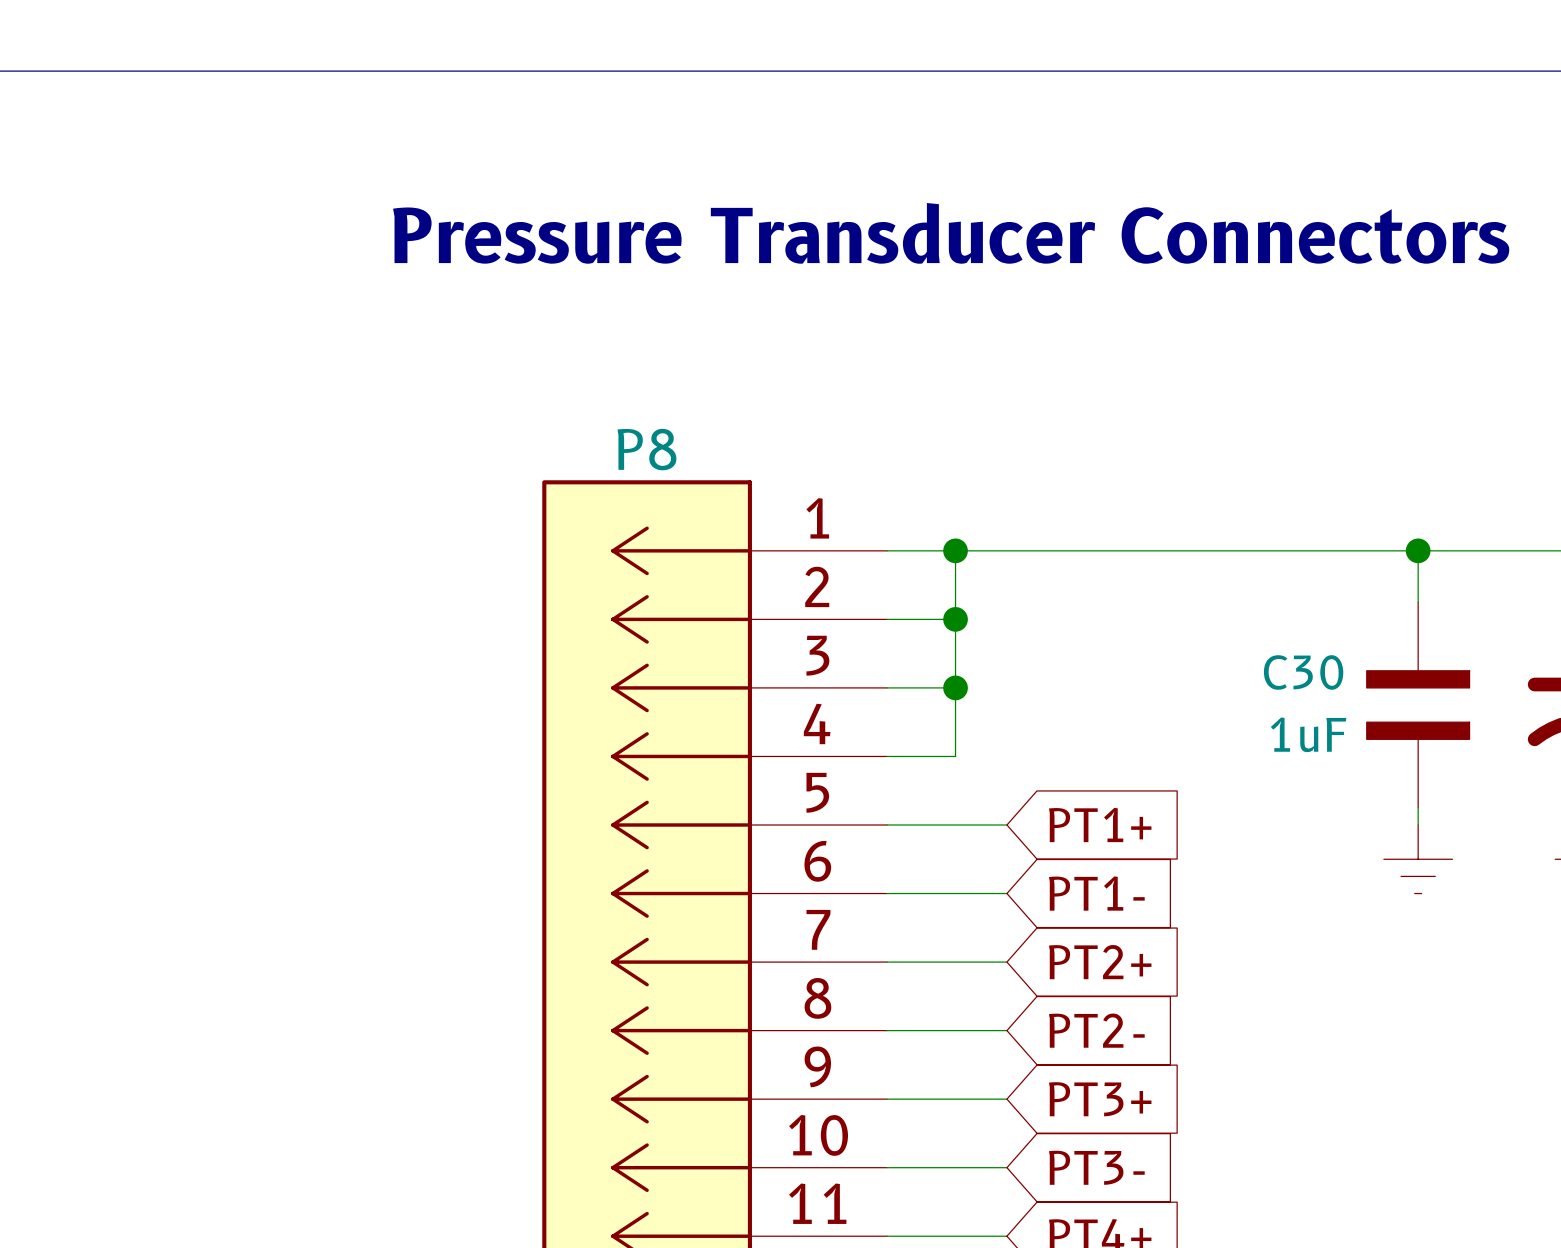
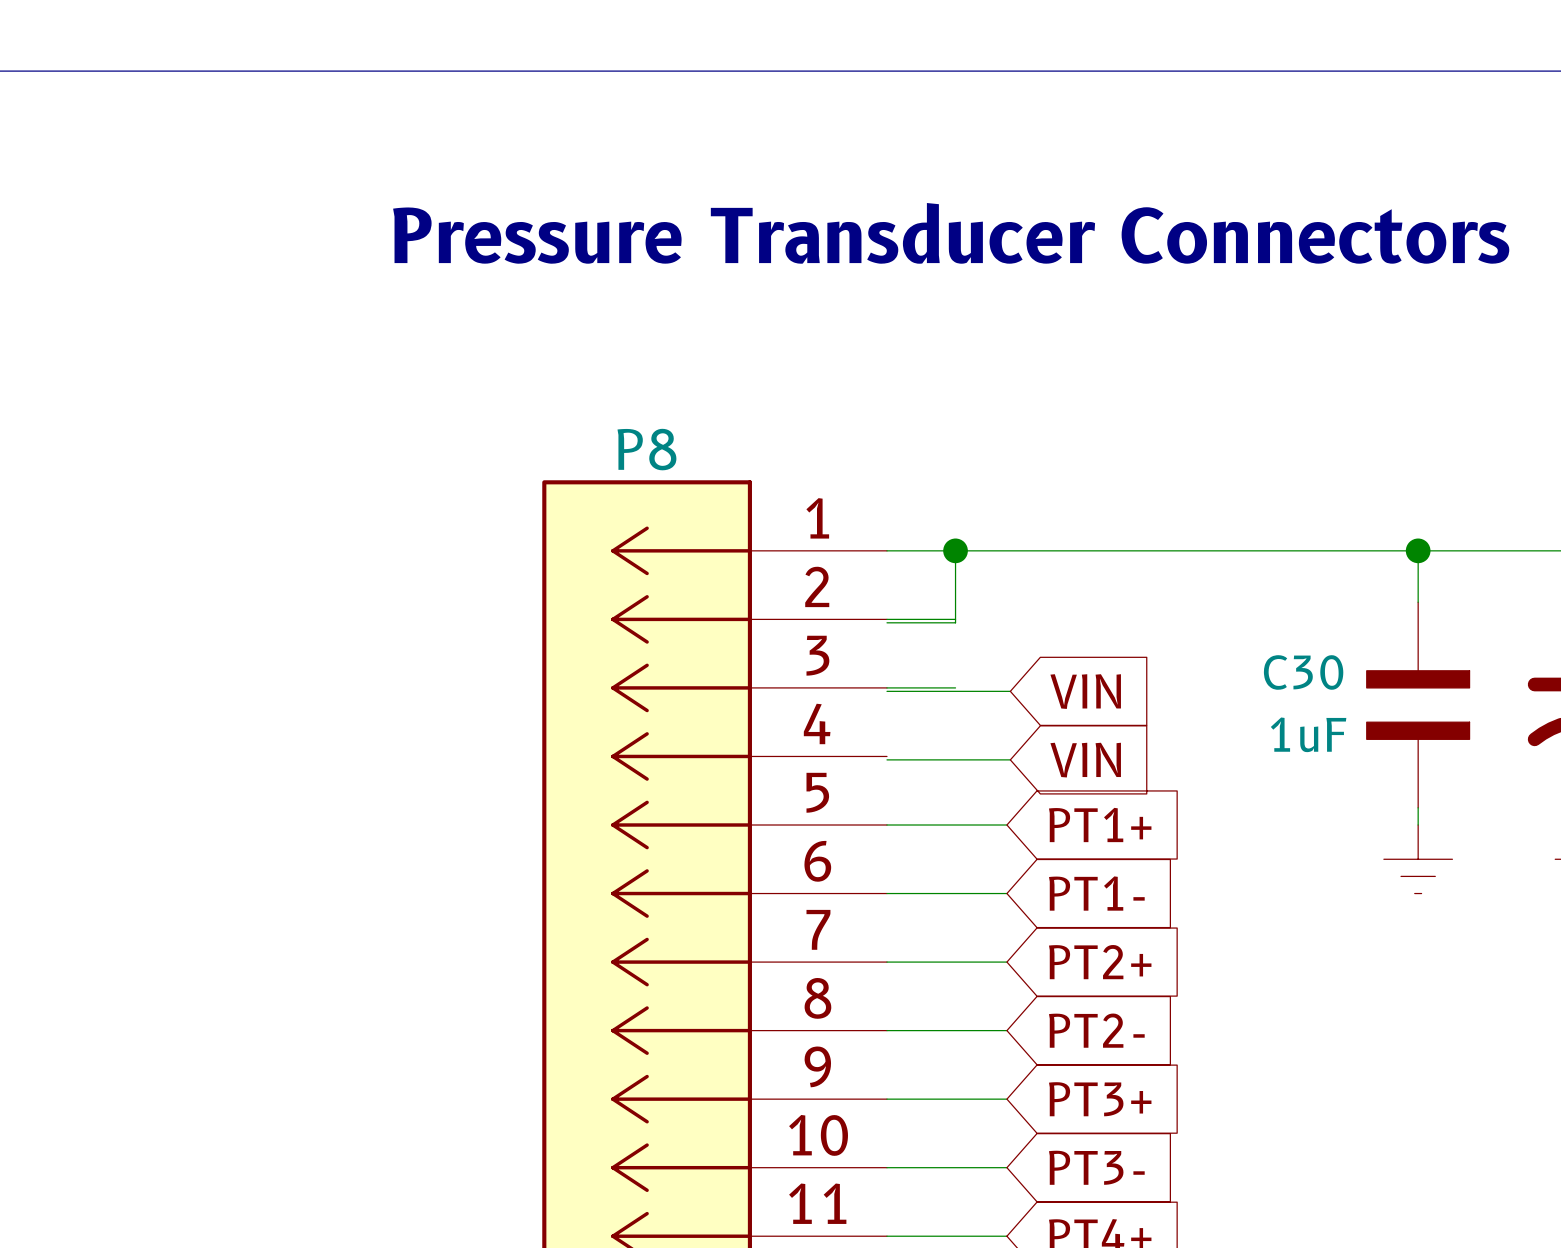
junction: (955, 619) -> none
wire: (955, 622) (955, 756) (887, 756) -> (955, 622) (887, 622)
junction: (955, 687) -> none
wire: none -> (887, 691) (1010, 691)
global label: none -> VIN (1085, 691)
wire: none -> (887, 759) (1010, 759)
global label: none -> VIN (1085, 760)

